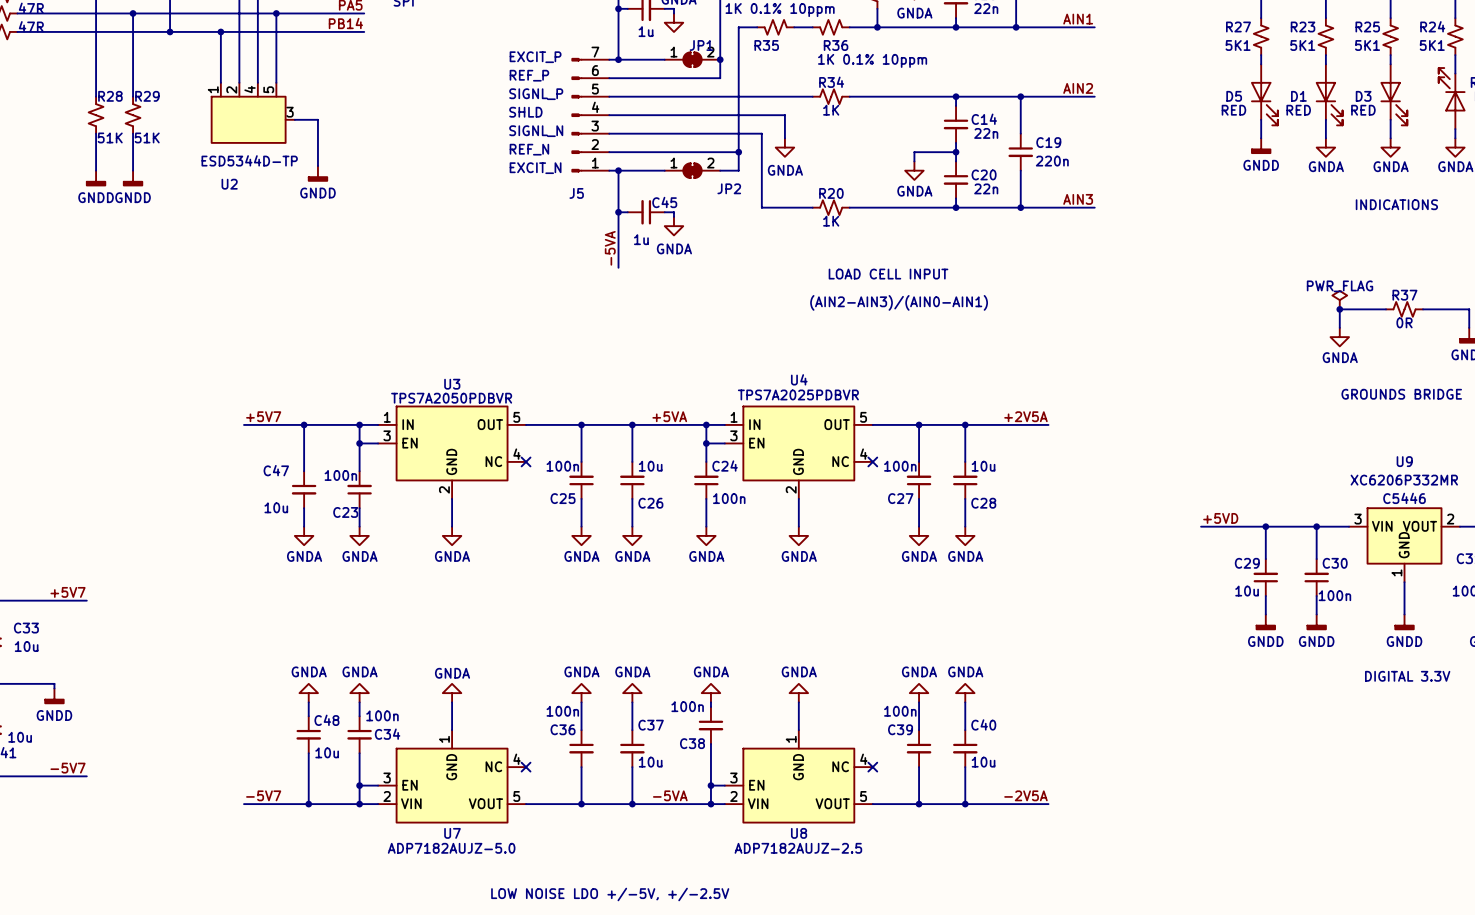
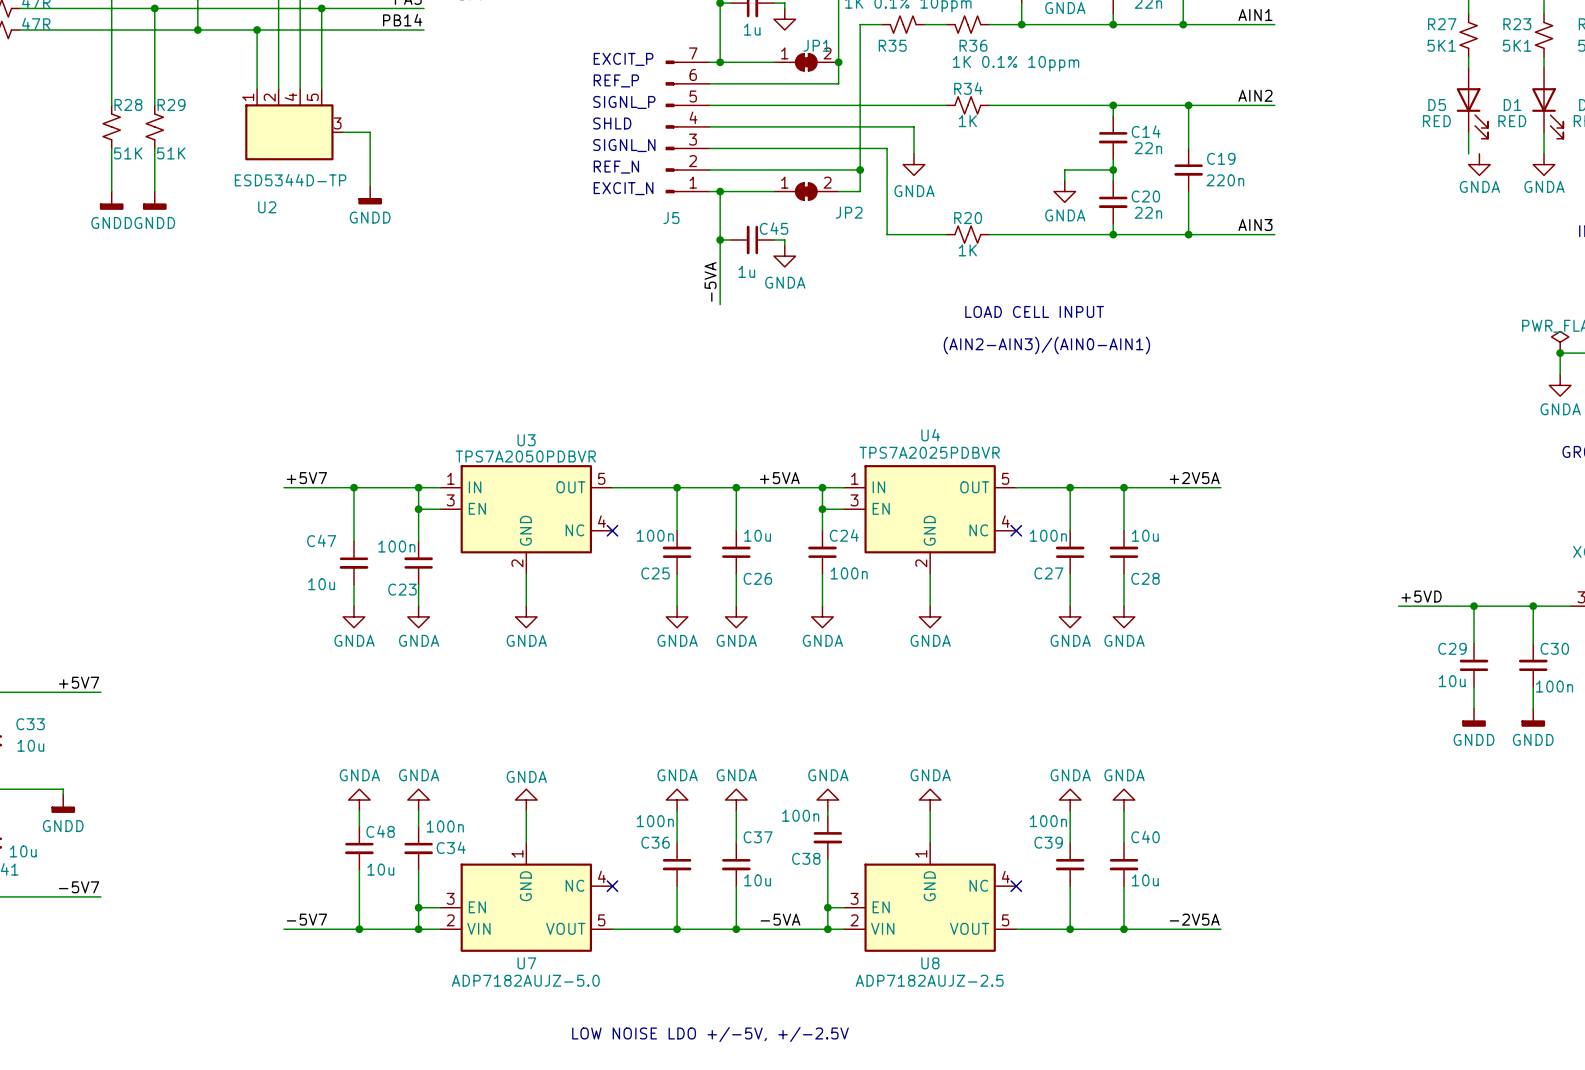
power symbol: GNDD (1261, 146) -> none
power symbol: none -> GNDA (1479, 164)

